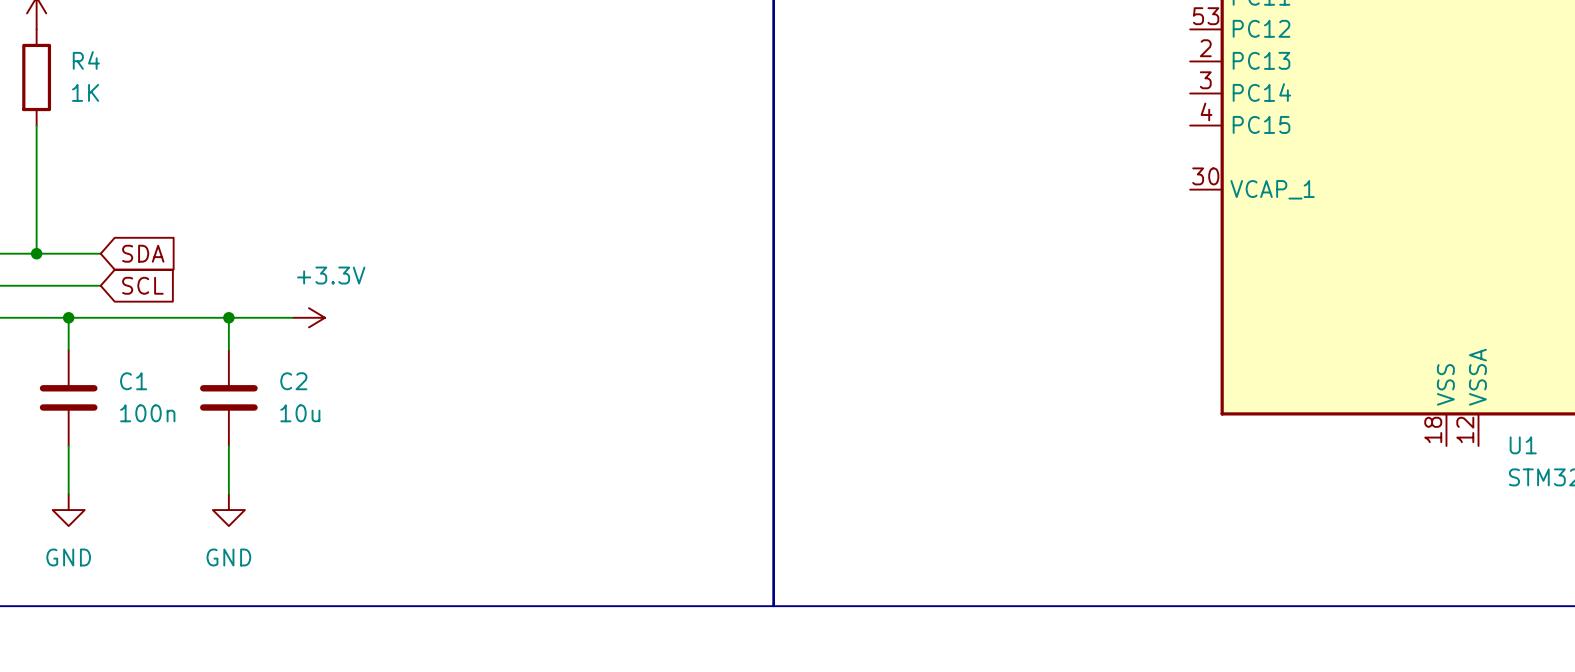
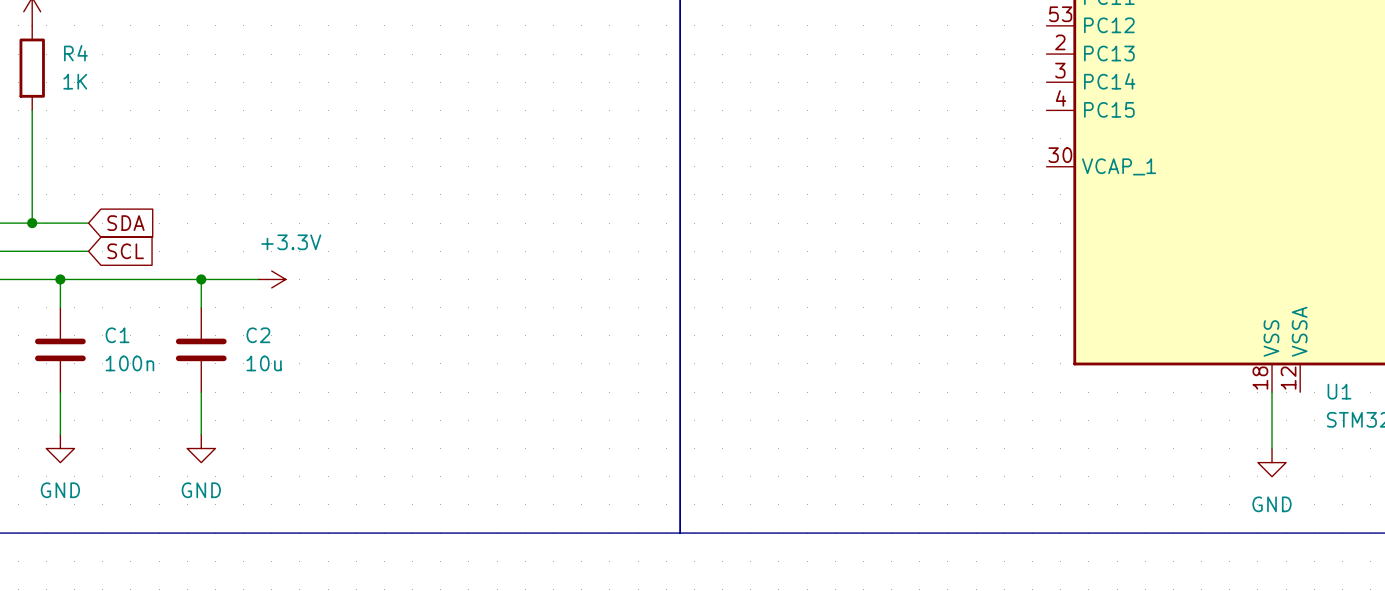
wire: none -> (1272, 392) (1272, 448)
power symbol: none -> GND (1272, 462)

